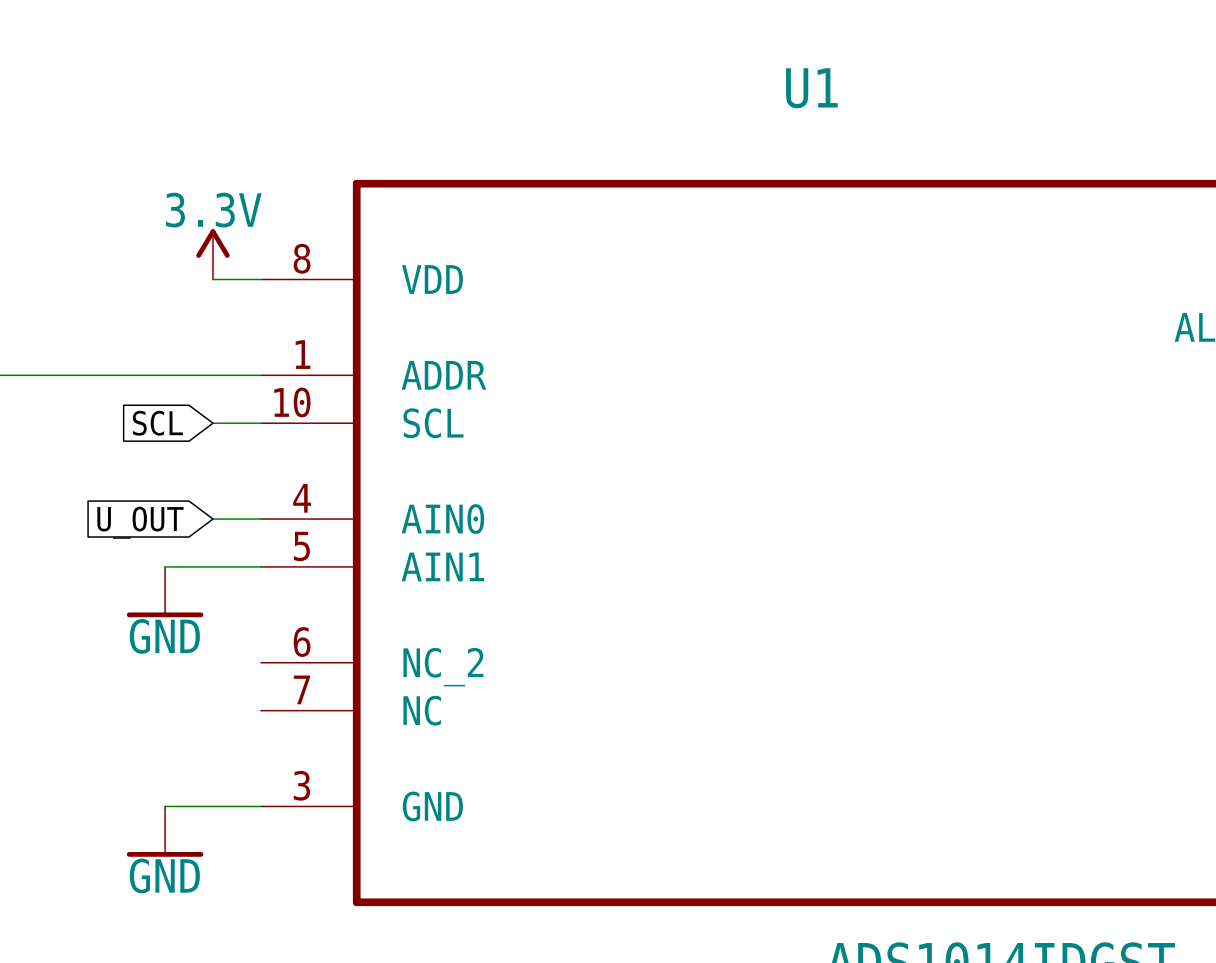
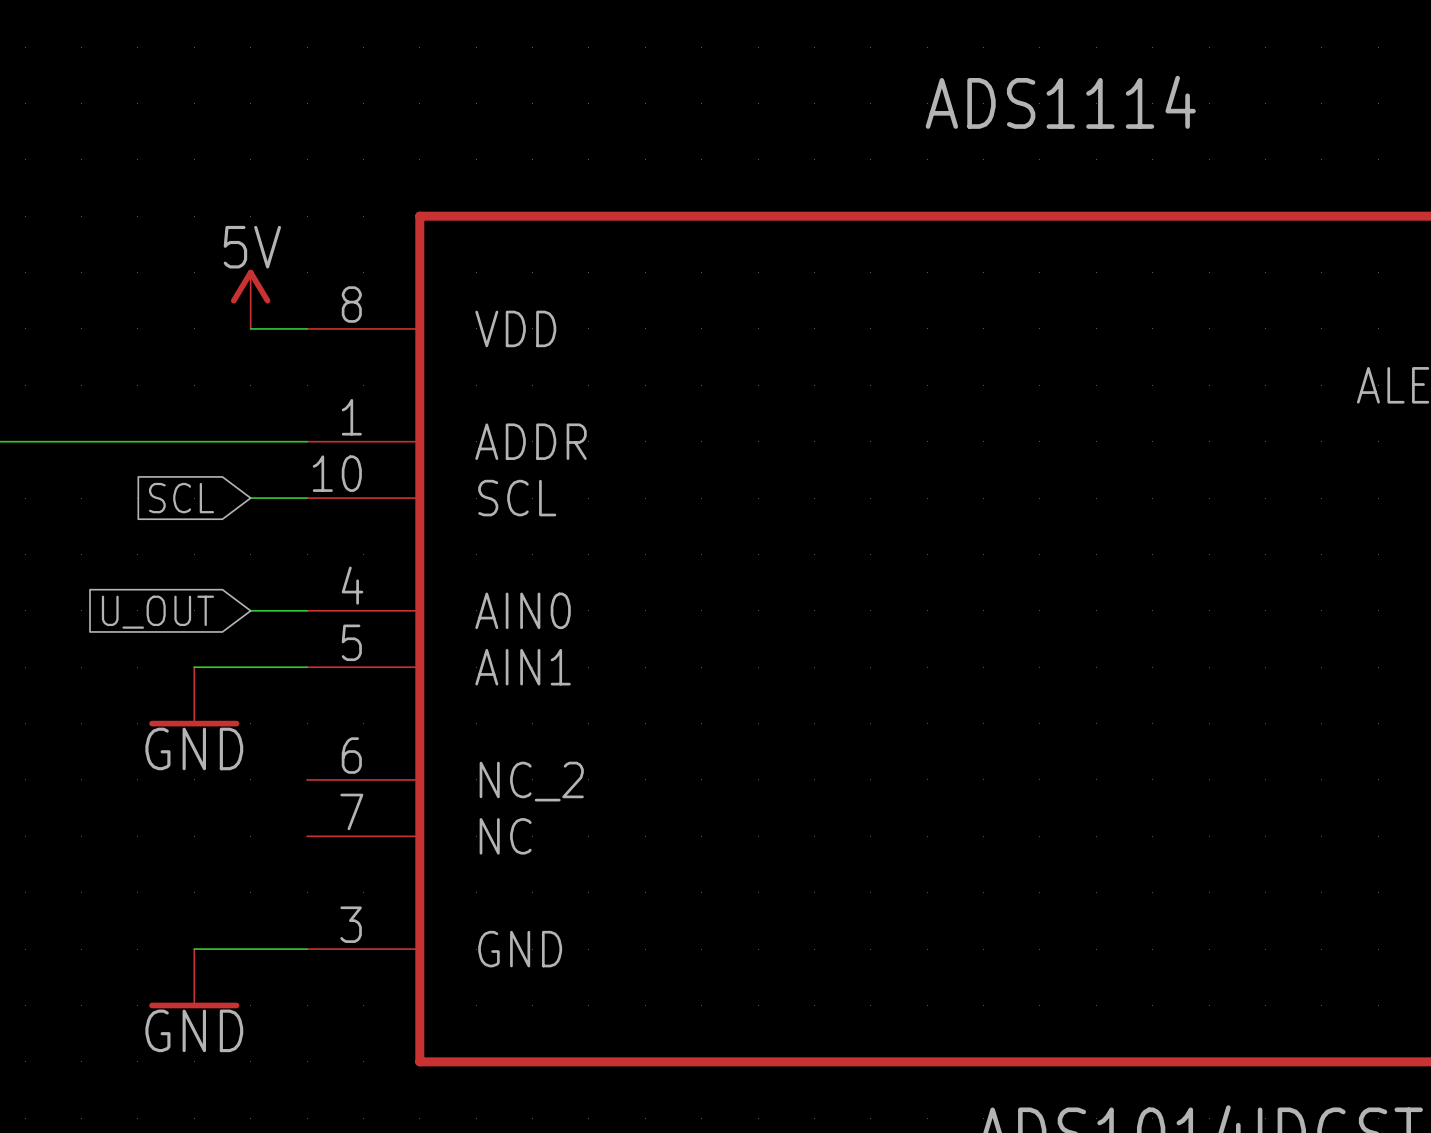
U1 name: U1 (811, 88) -> ADS1114 (1060, 102)
power symbol: 3.3V (212, 254) -> 5V (250, 299)

